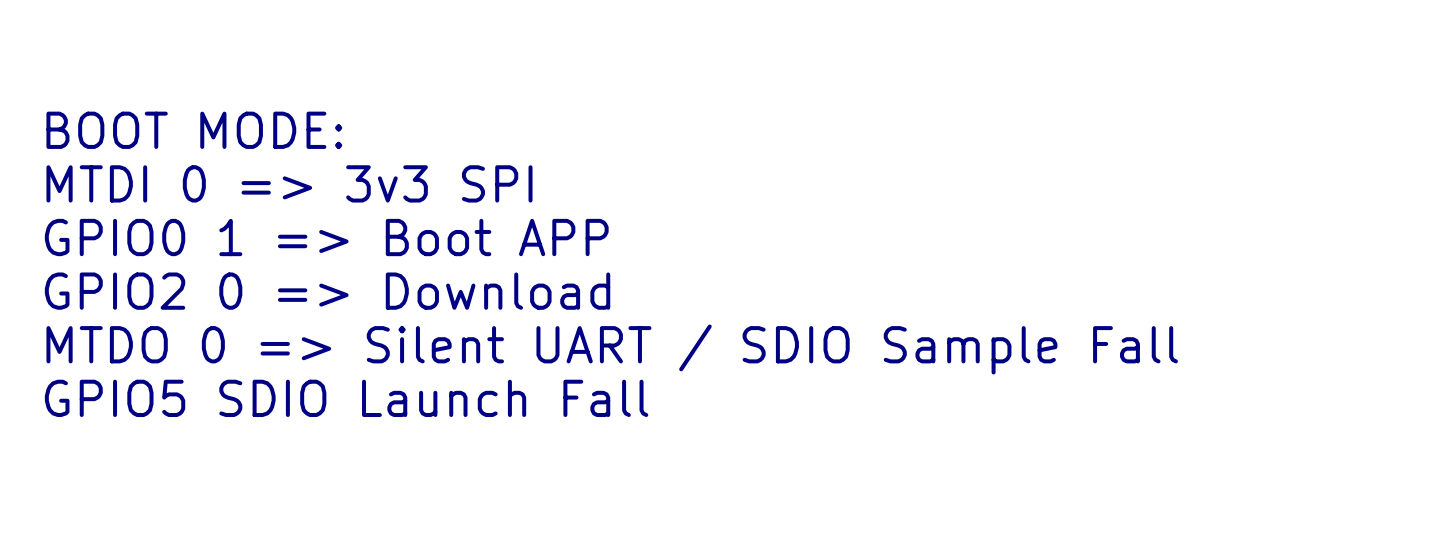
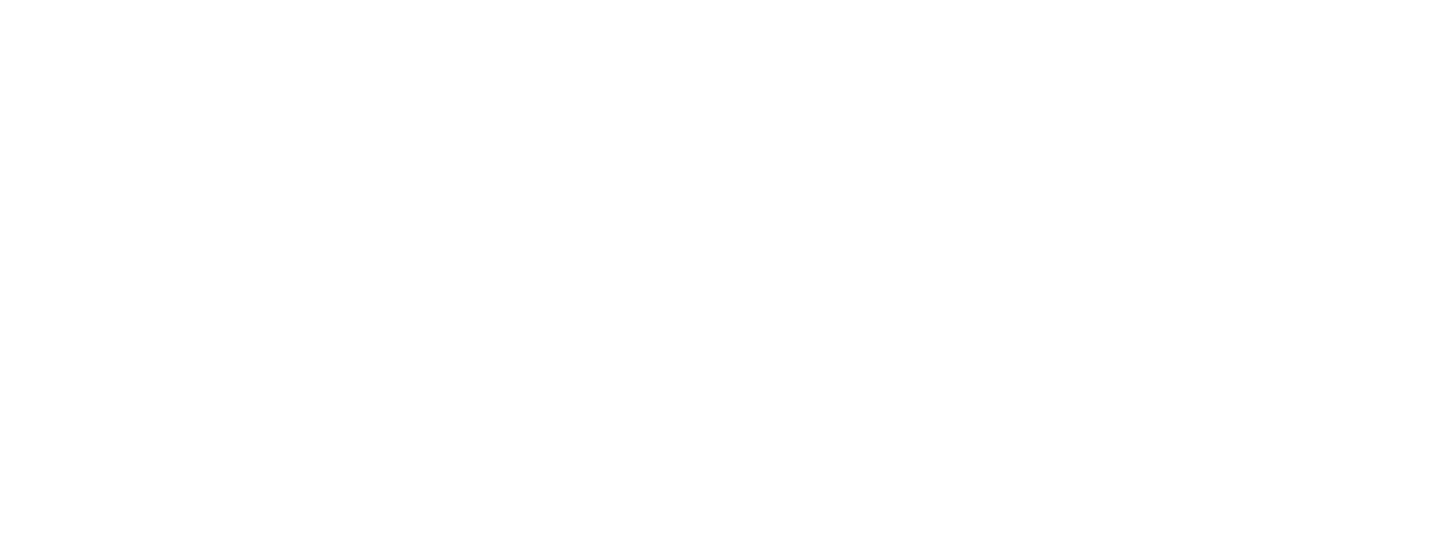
text: BOOT MODE: (194, 130) -> none
text: MTDI 0 => 3v3 SPI (289, 183) -> none
text: GPIO0 1 => Boot APP (326, 237) -> none
text: GPIO2 0 => Download (327, 291) -> none
text: MTDO 0 => Silent UART / SDIO Sample Fall (612, 349) -> none
text: GPIO5 SDIO Launch Fall (346, 398) -> none

